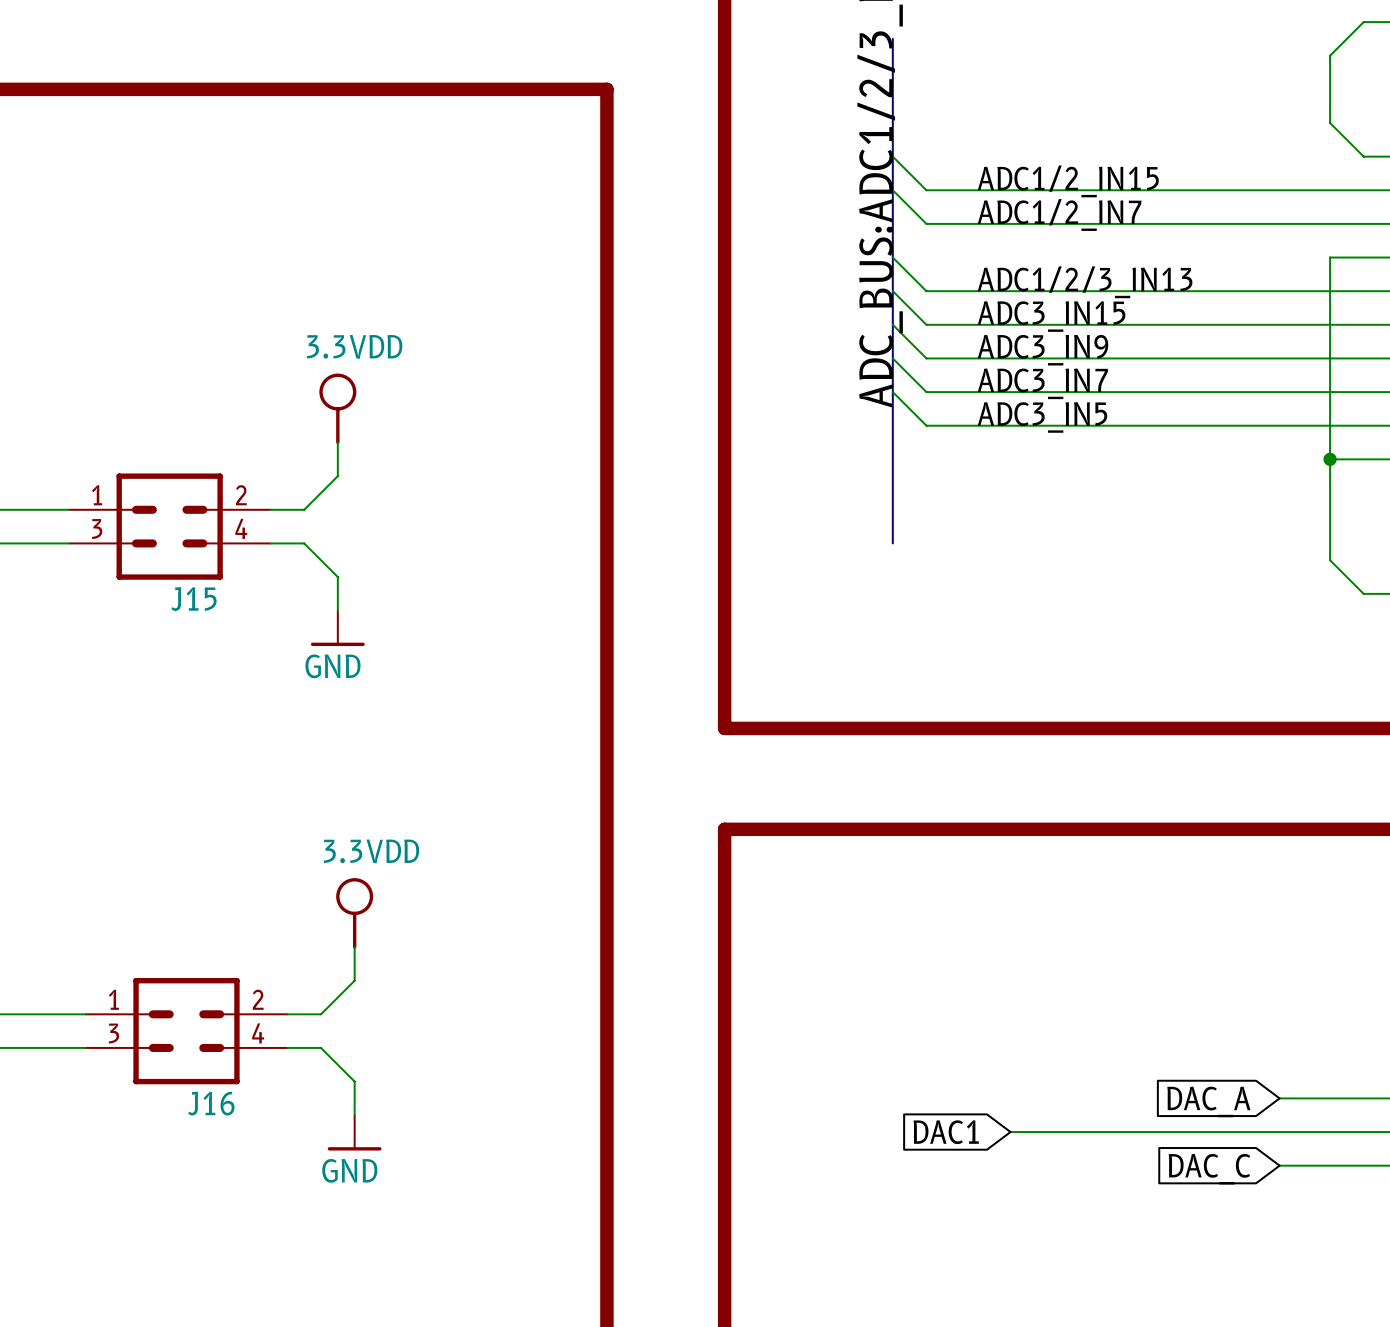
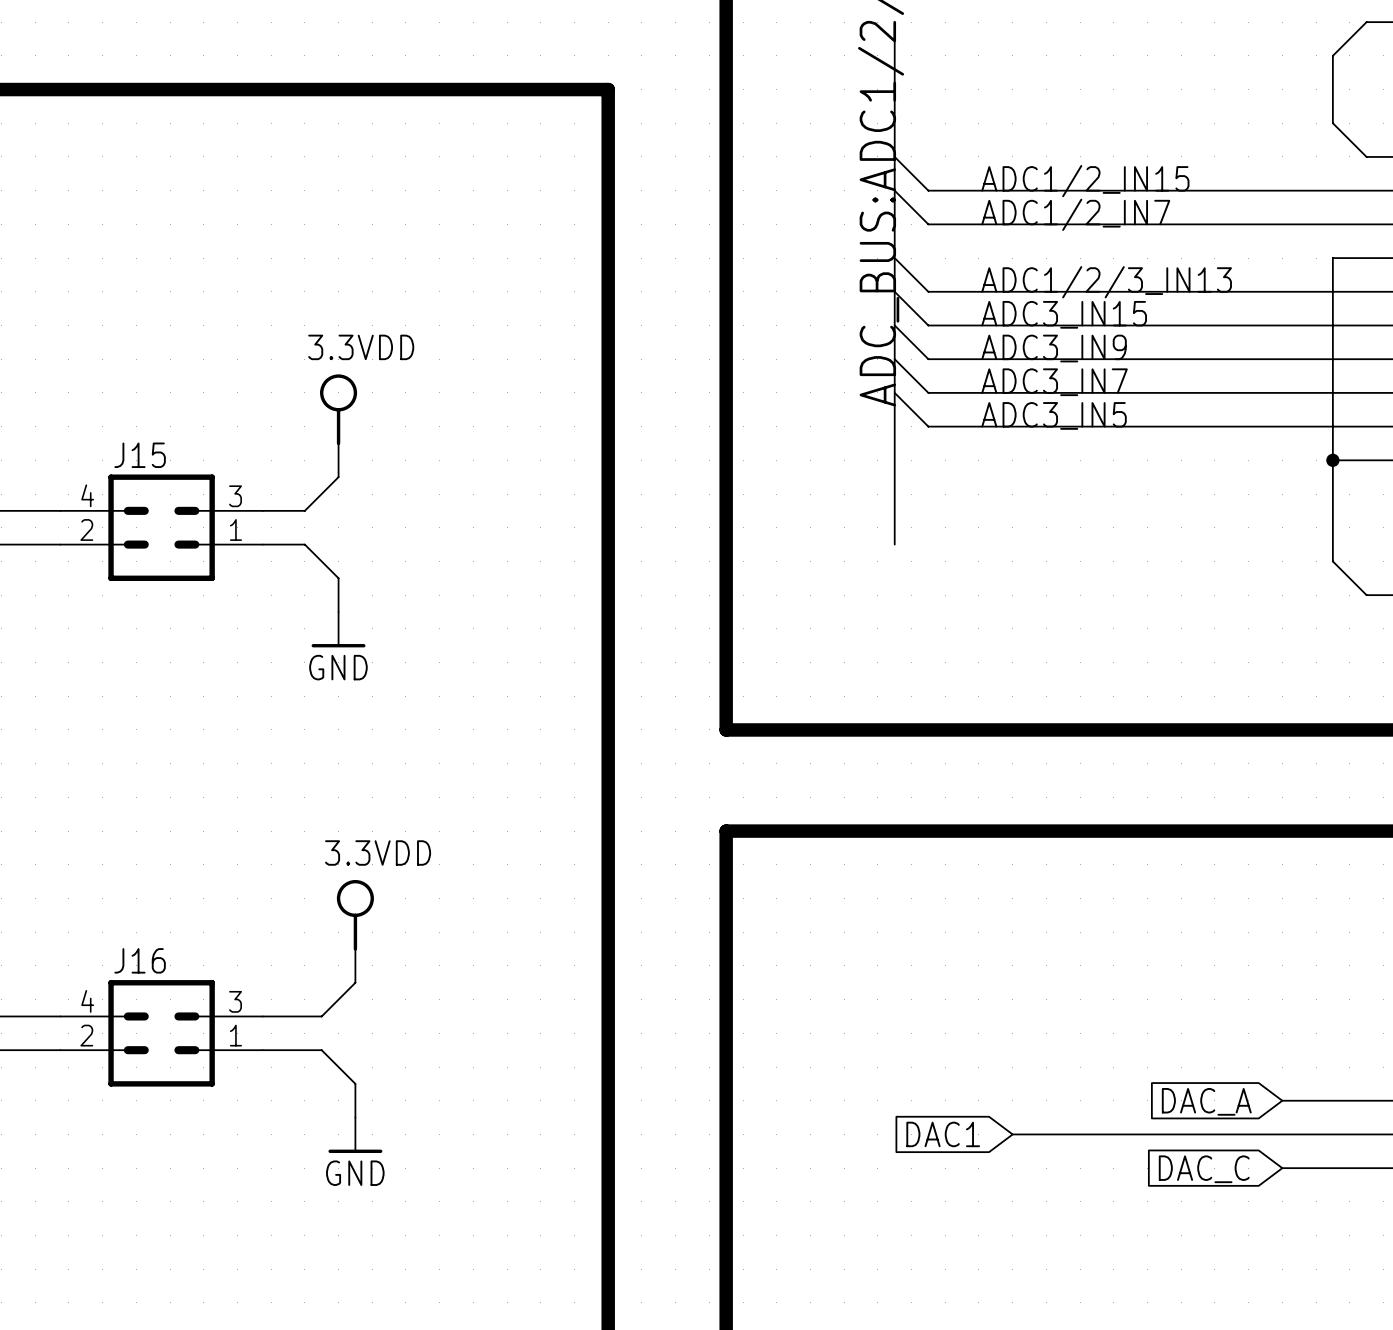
J15 rotation: 0° (169, 526) -> 180° (161, 527)
J16 rotation: 0° (186, 1031) -> 180° (161, 1033)

